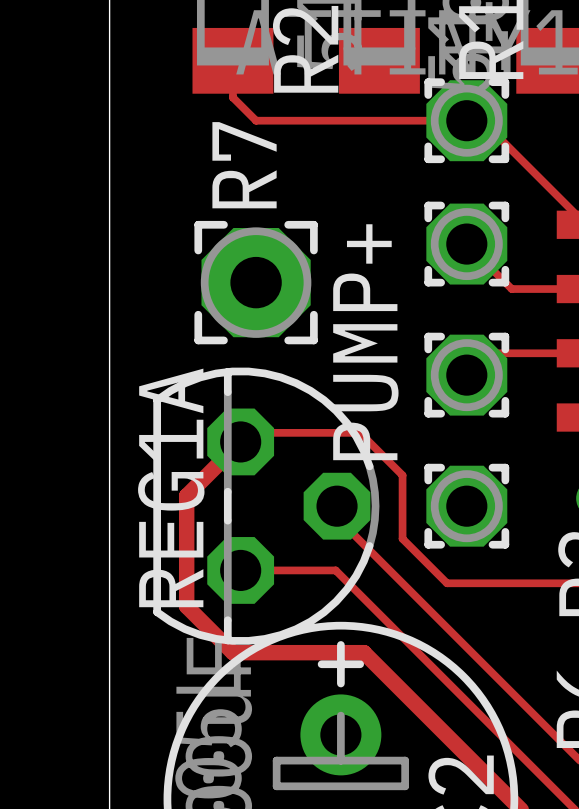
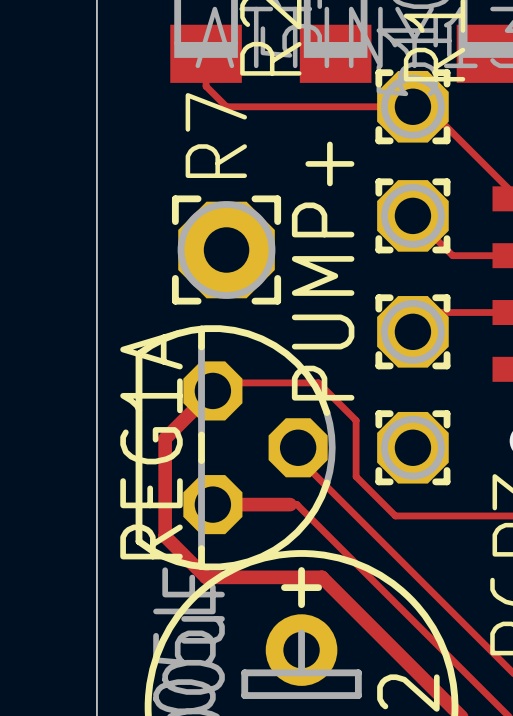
track width: thin (240, 570) (328, 570) -> thick (212, 504) (290, 504)

